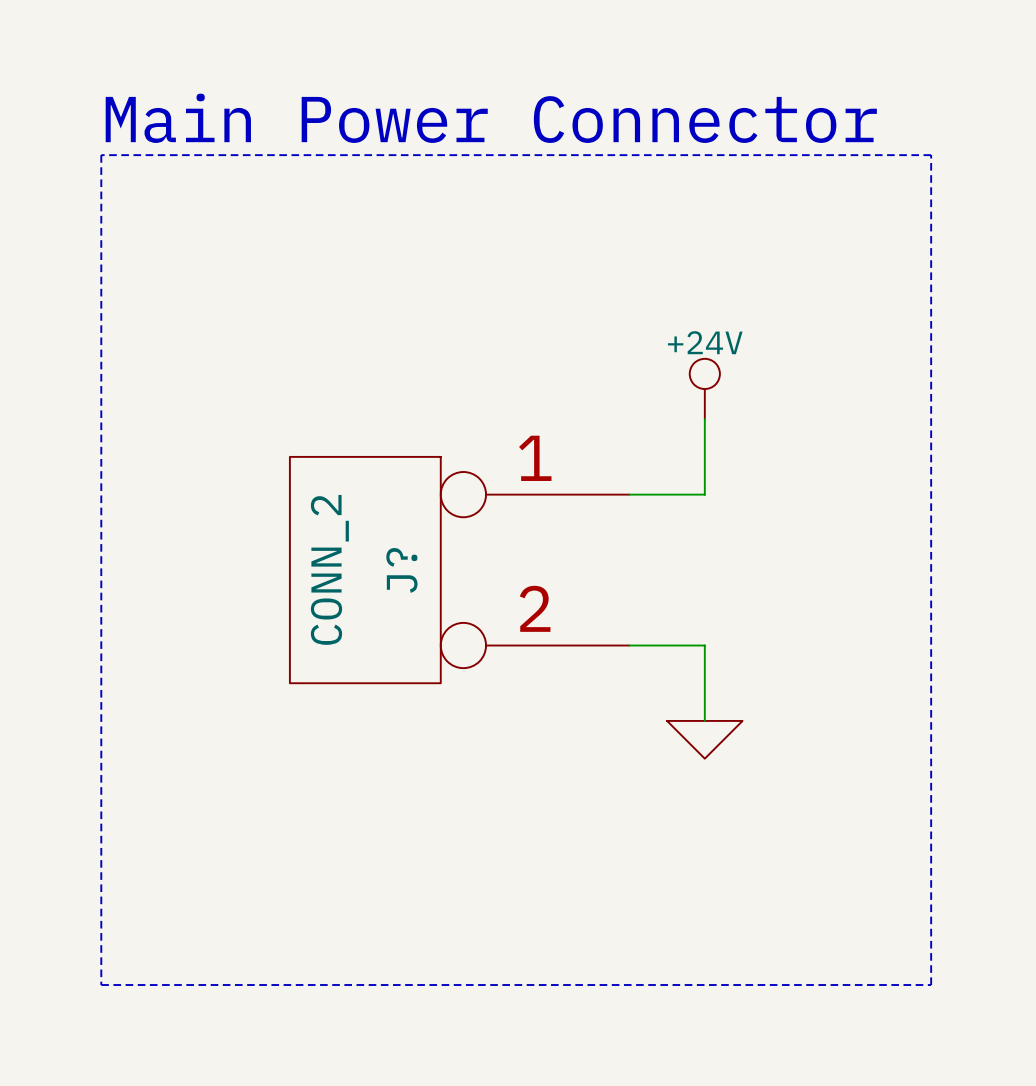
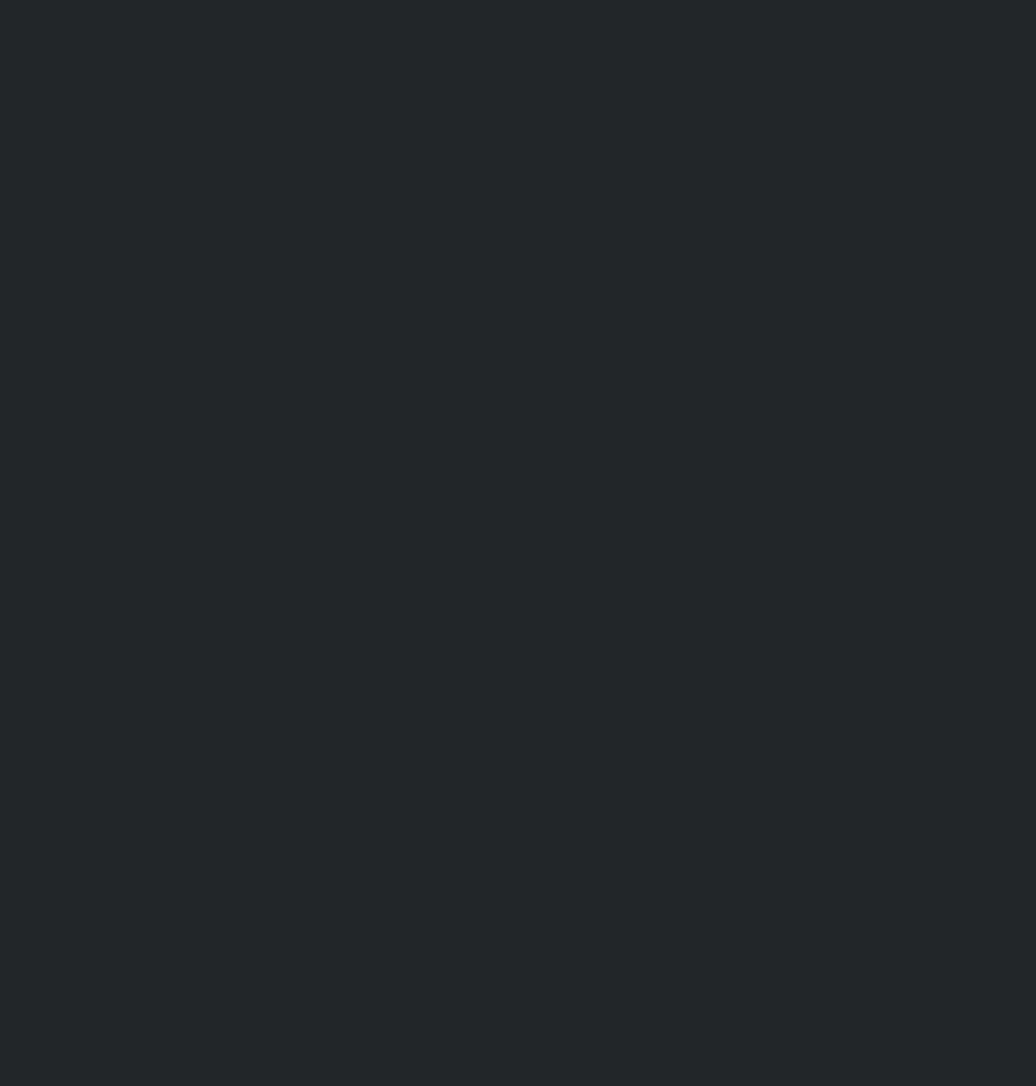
text: Main Power Connector (491, 118) -> none
line: (101, 155) (101, 985) (931, 985) (931, 155) (101, 155) -> none
power symbol: +24V (704, 389) -> none
wire: (704, 419) (704, 494) (629, 494) -> none
J?: CONN_2 (459, 570) -> none
wire: (629, 645) (704, 645) (704, 720) -> none
power symbol: (704, 739) -> none

